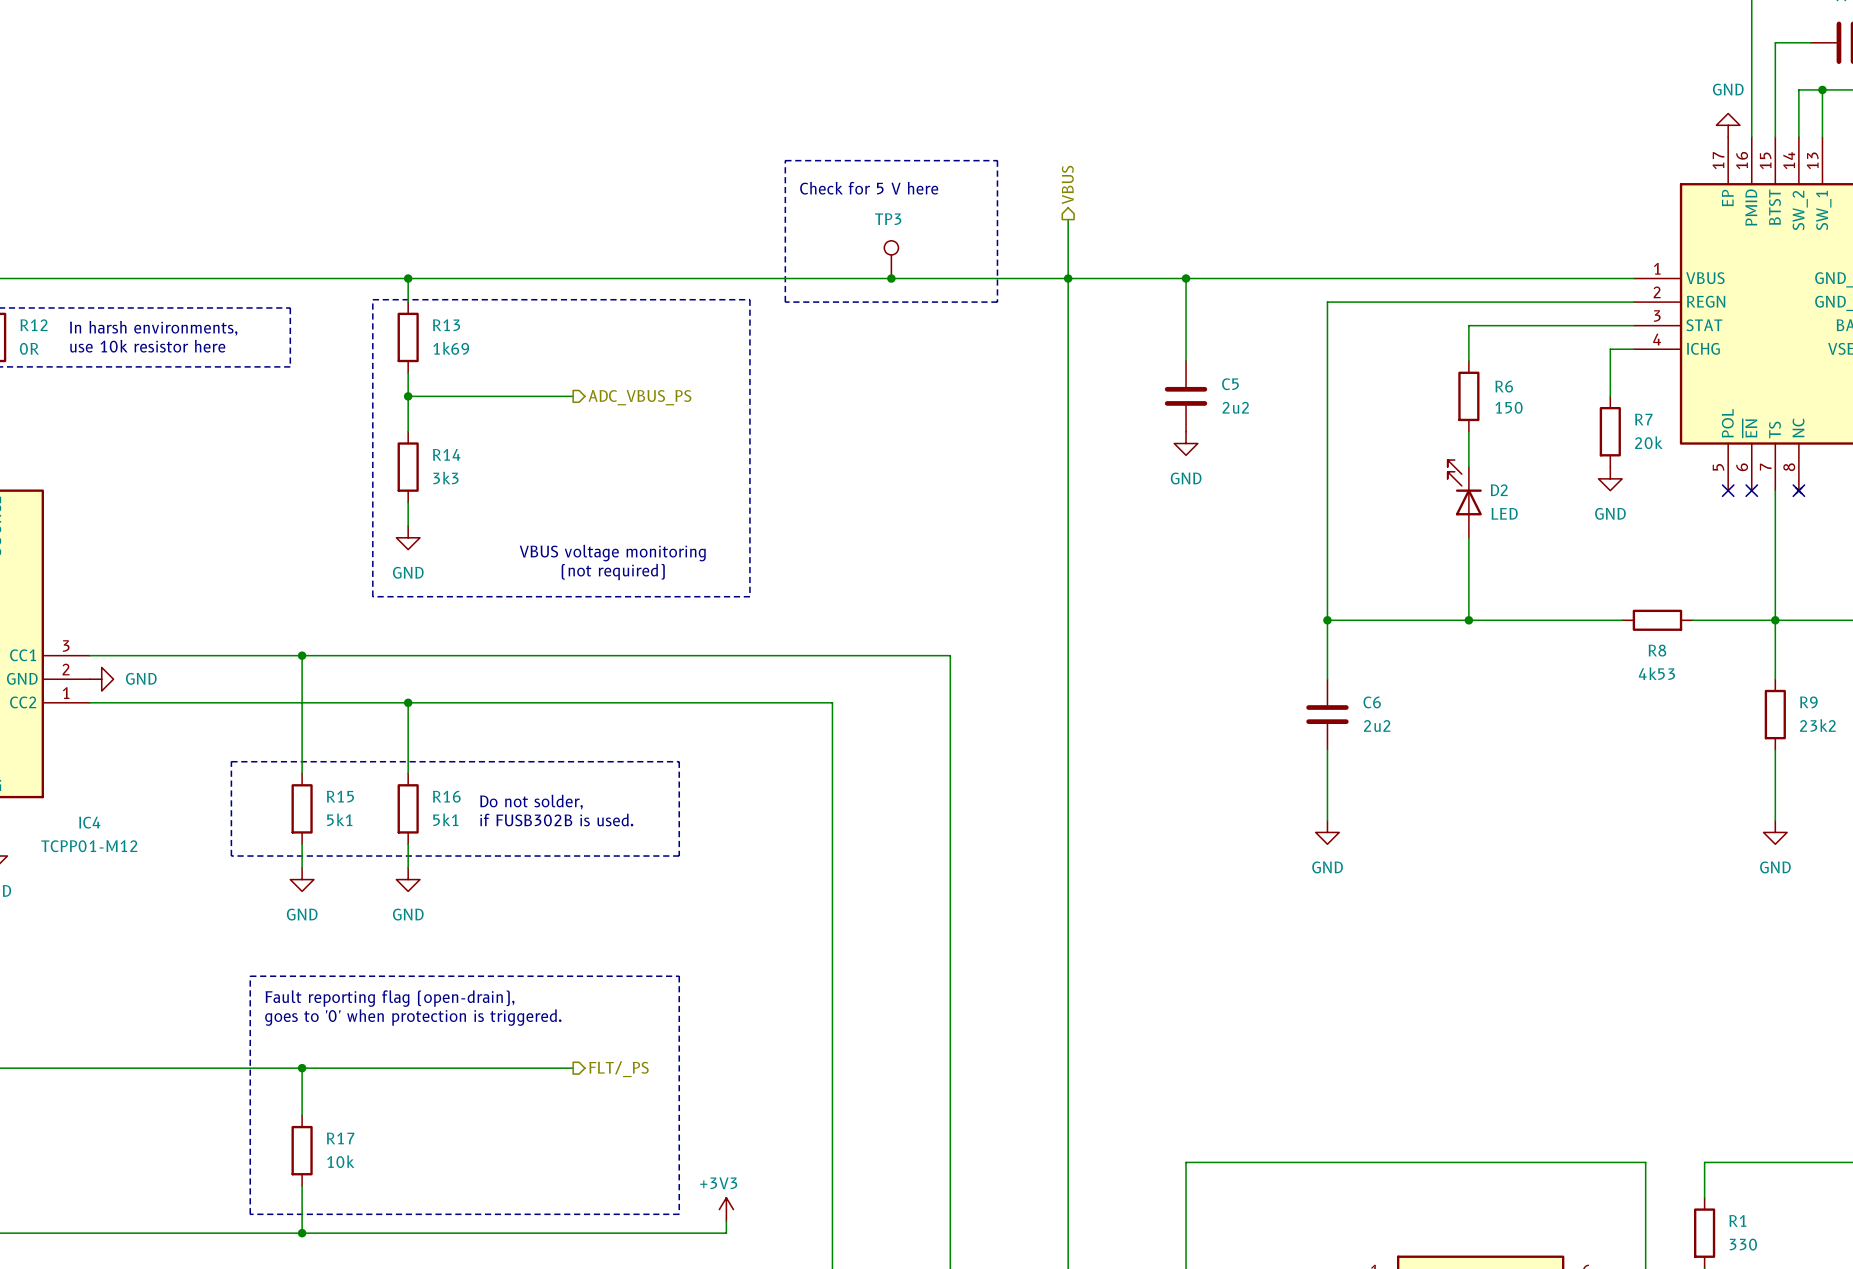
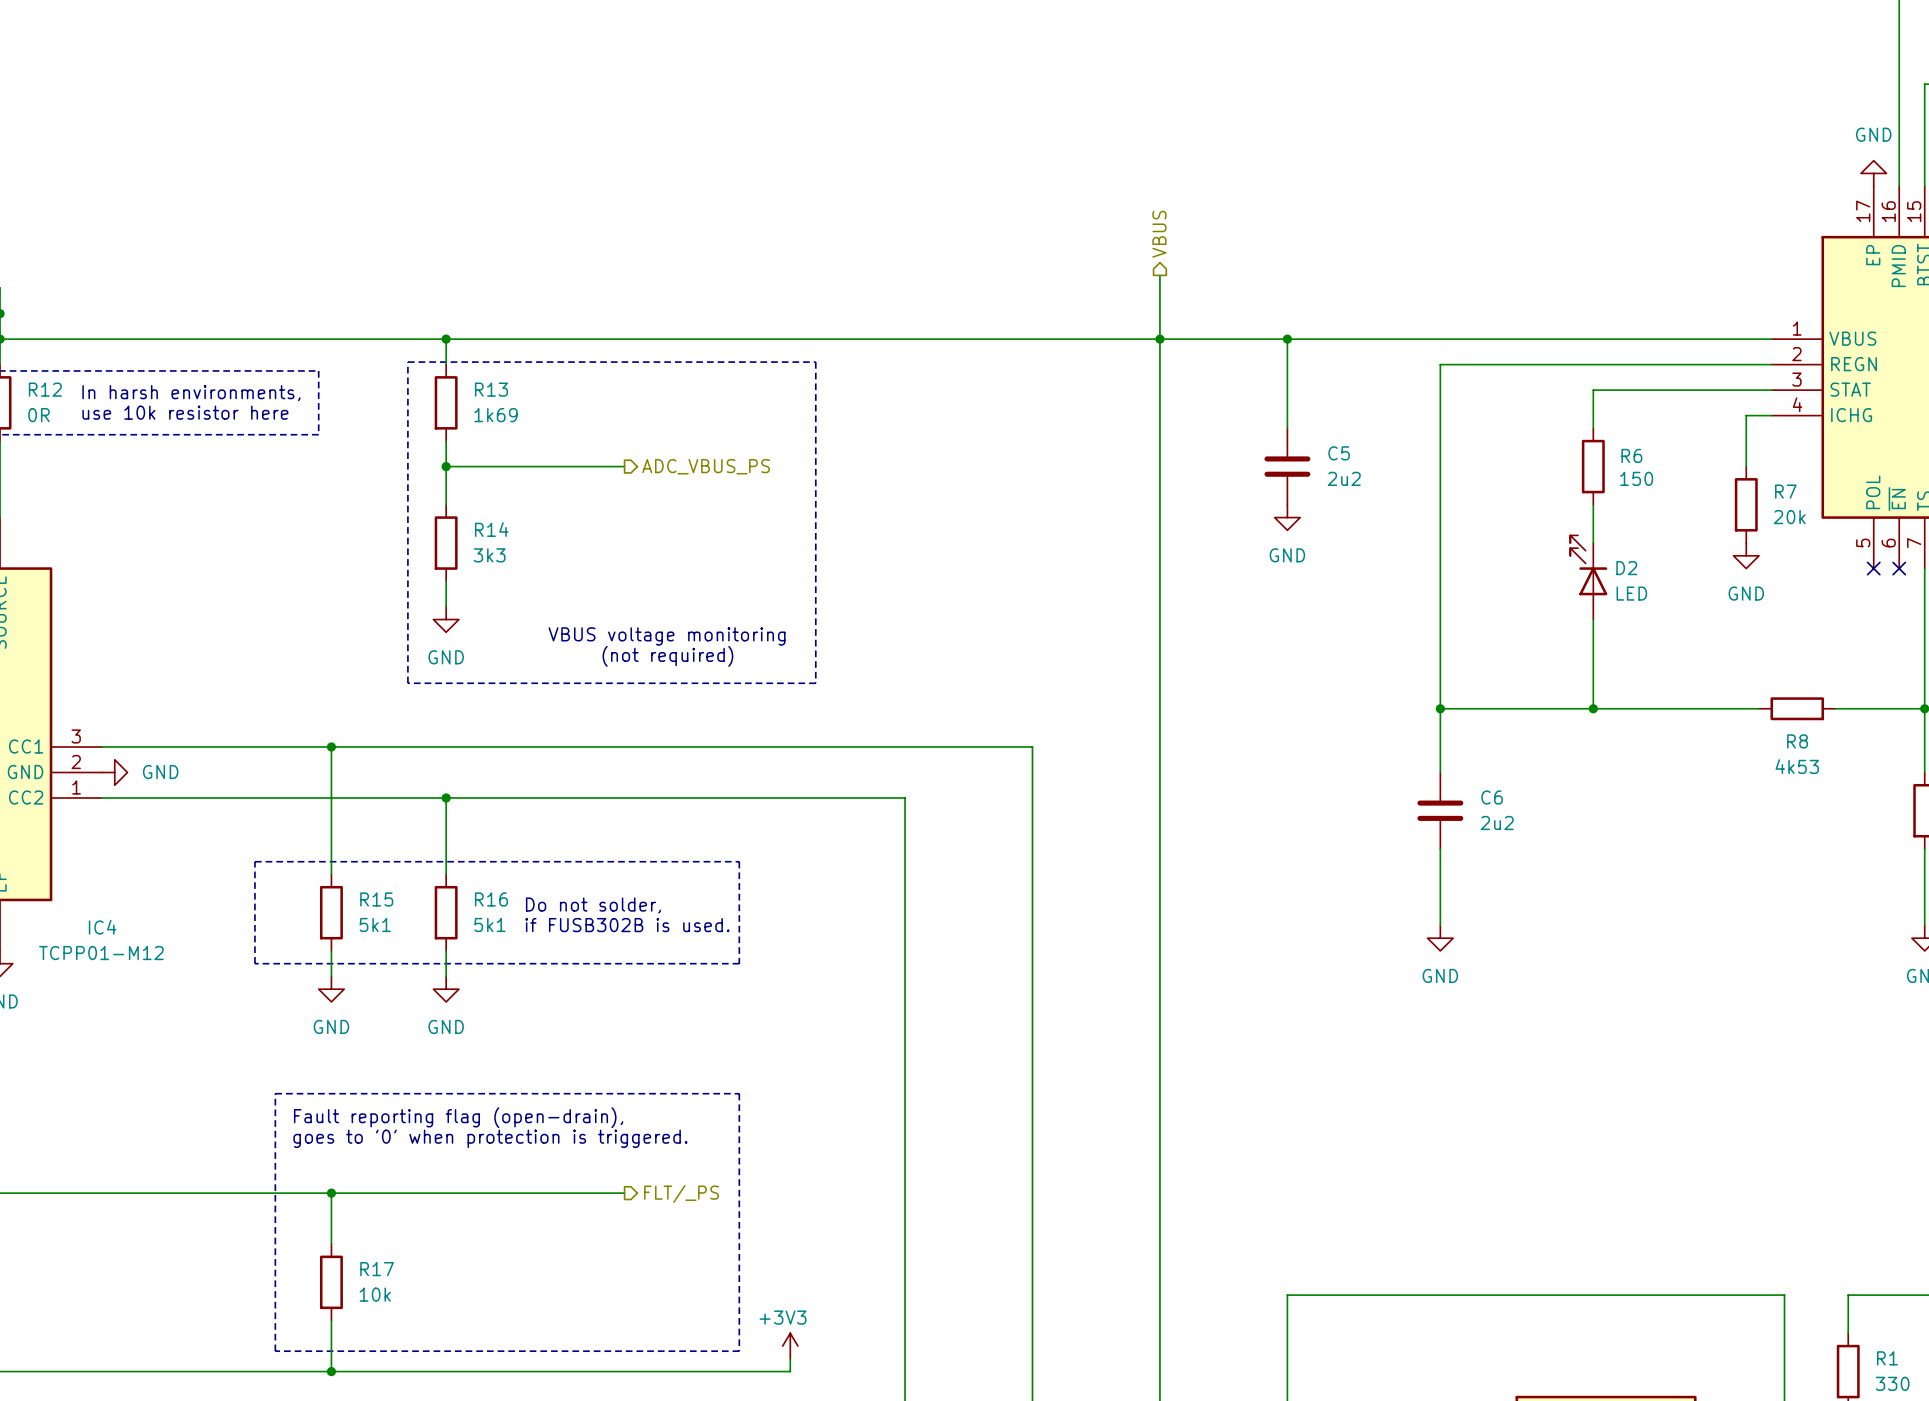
line: (785, 160) (997, 160) (997, 302) (785, 302) (785, 160) -> none
text: Check for 5 V here (869, 188) -> none
TP3: (891, 259) -> none
junction: (891, 278) -> none

